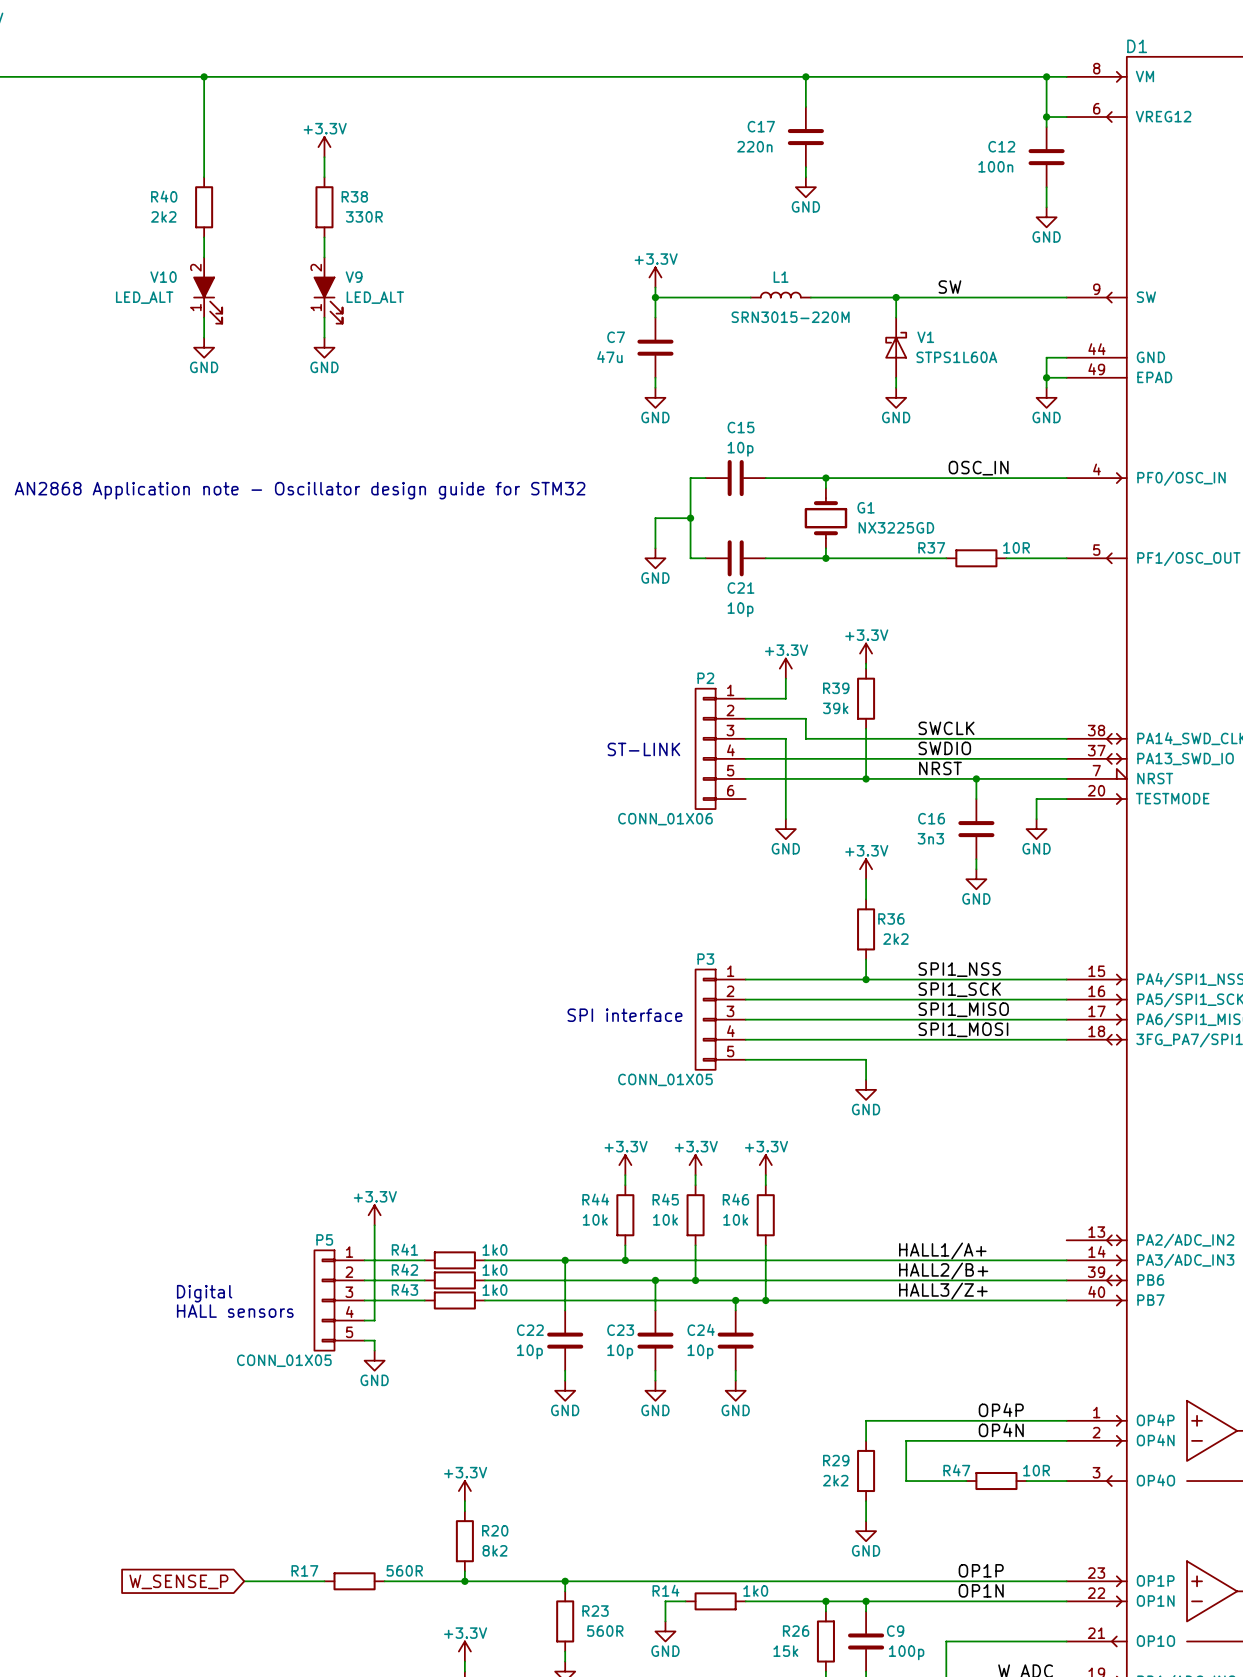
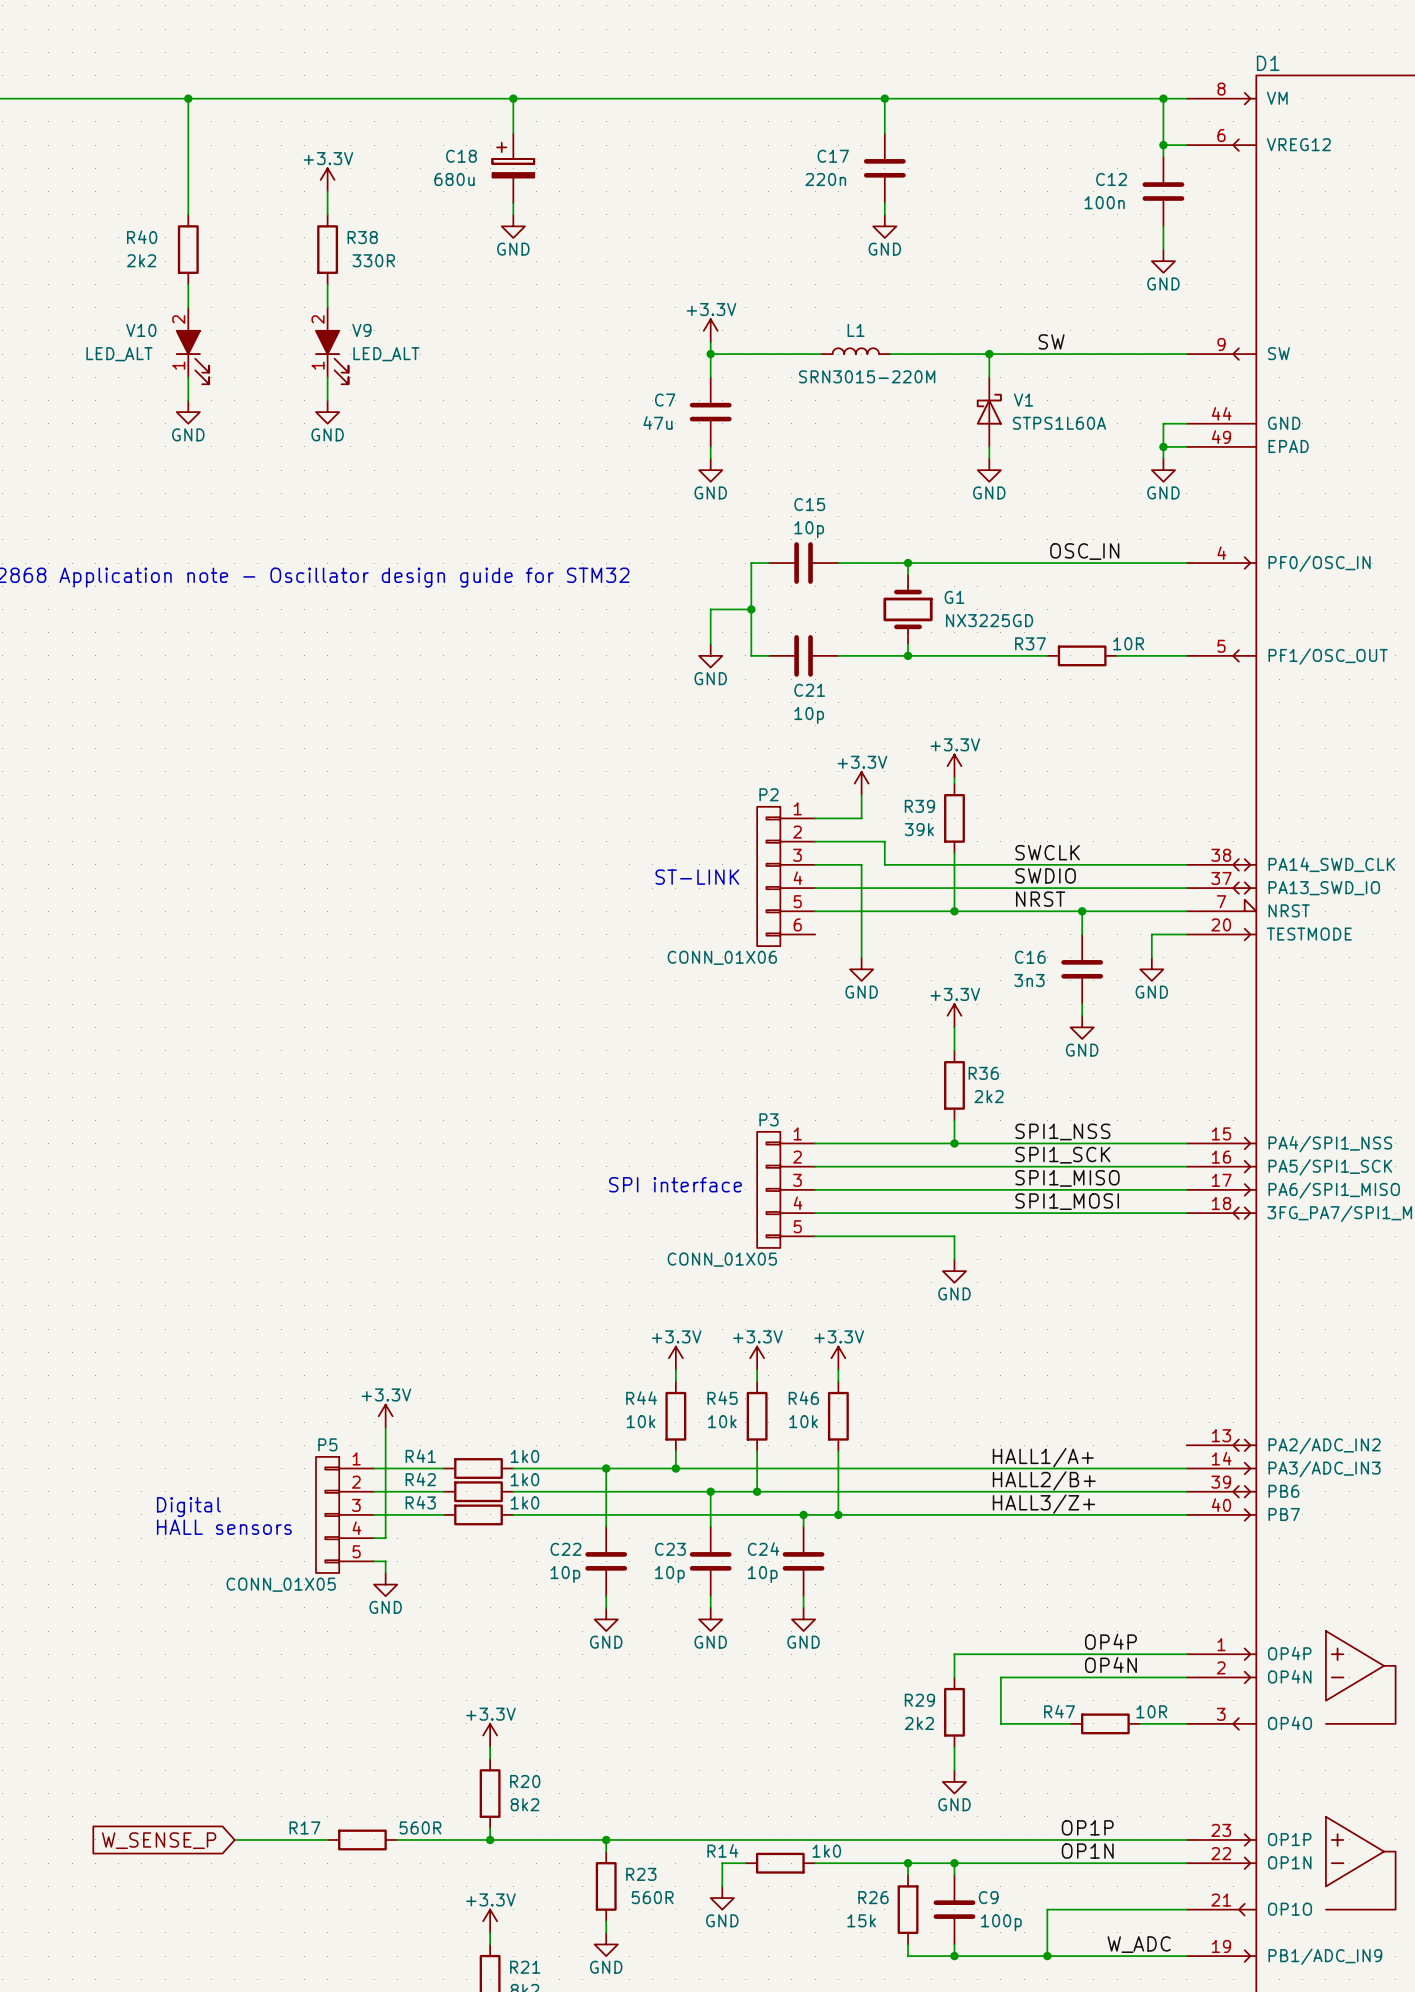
wire: none -> (513, 98) (513, 133)
junction: none -> (513, 98)
C18: none -> 680u (513, 168)
wire: none -> (513, 203) (513, 214)
power symbol: none -> GND (513, 226)

